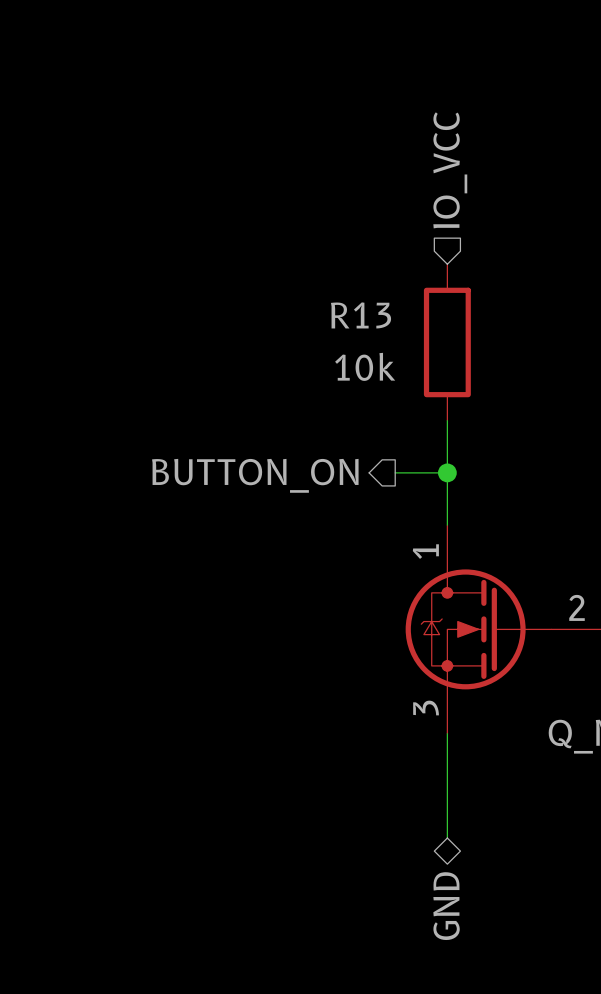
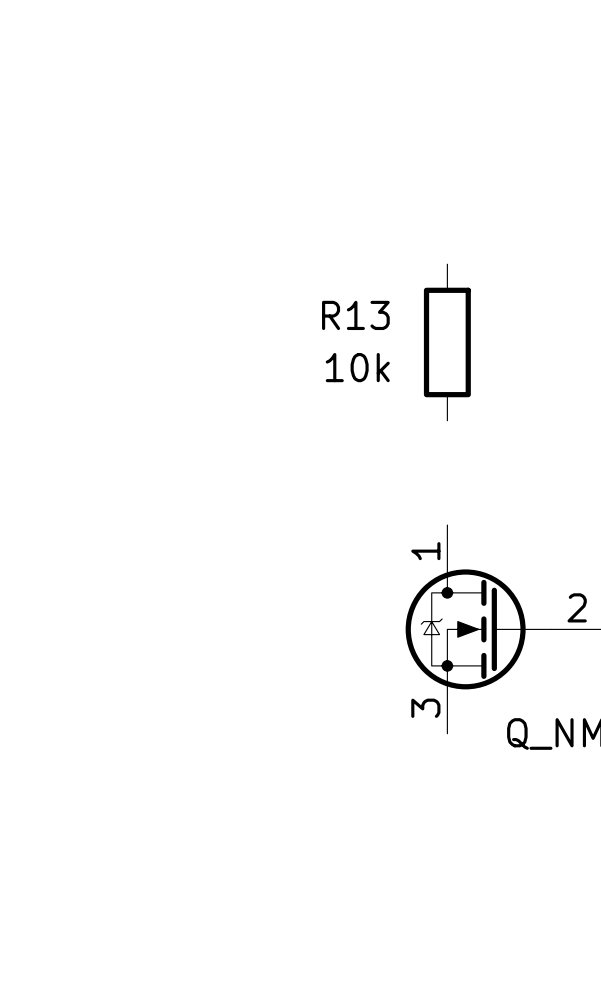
hierarchical label: IO_VCC (450, 170) -> none
wire: (447, 420) (447, 525) -> none
wire: (395, 472) (447, 472) -> none
junction: (447, 472) -> none
hierarchical label: BUTTON_ON (255, 475) -> none
wire: (447, 733) (447, 838) -> none
hierarchical label: GND (446, 906) -> none

